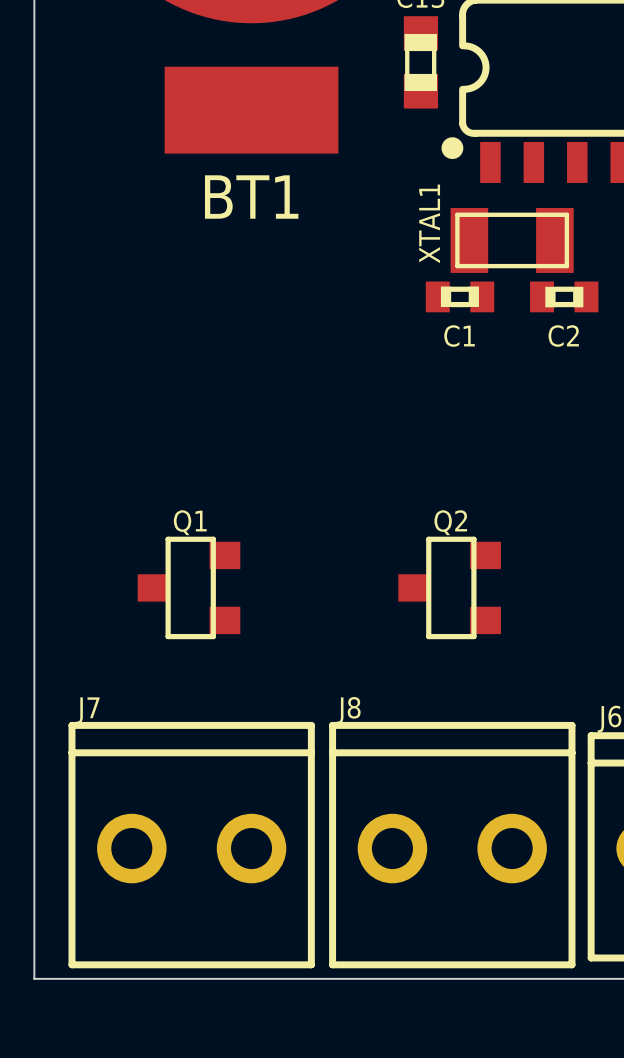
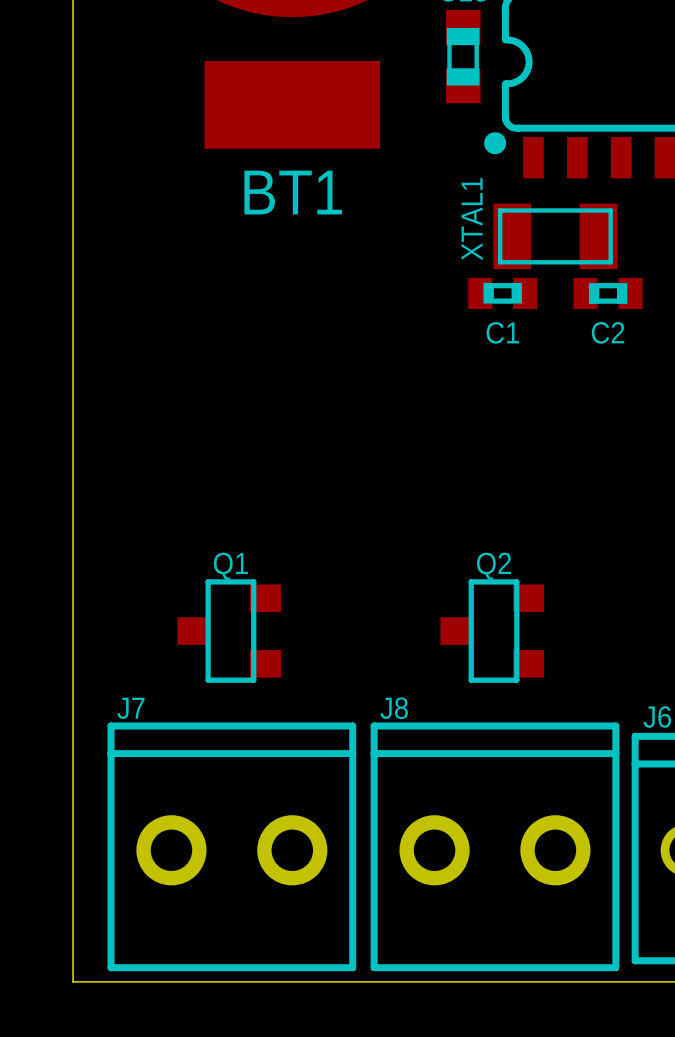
Q1 position: (189, 587) -> (229, 631)
Q2 position: (449, 587) -> (492, 631)

